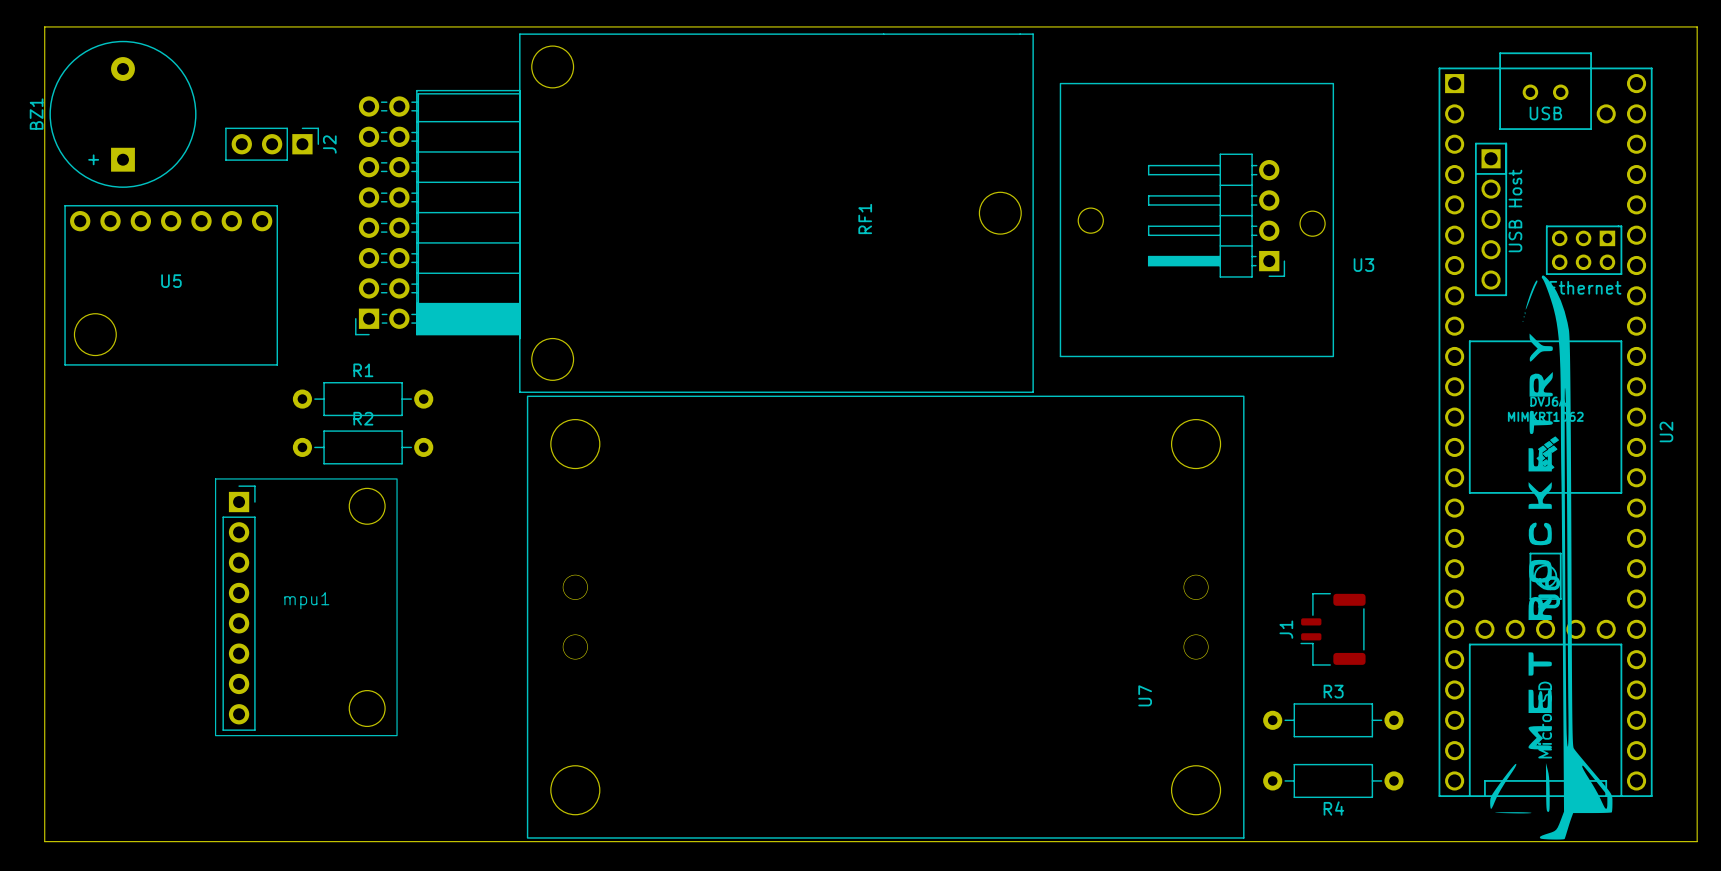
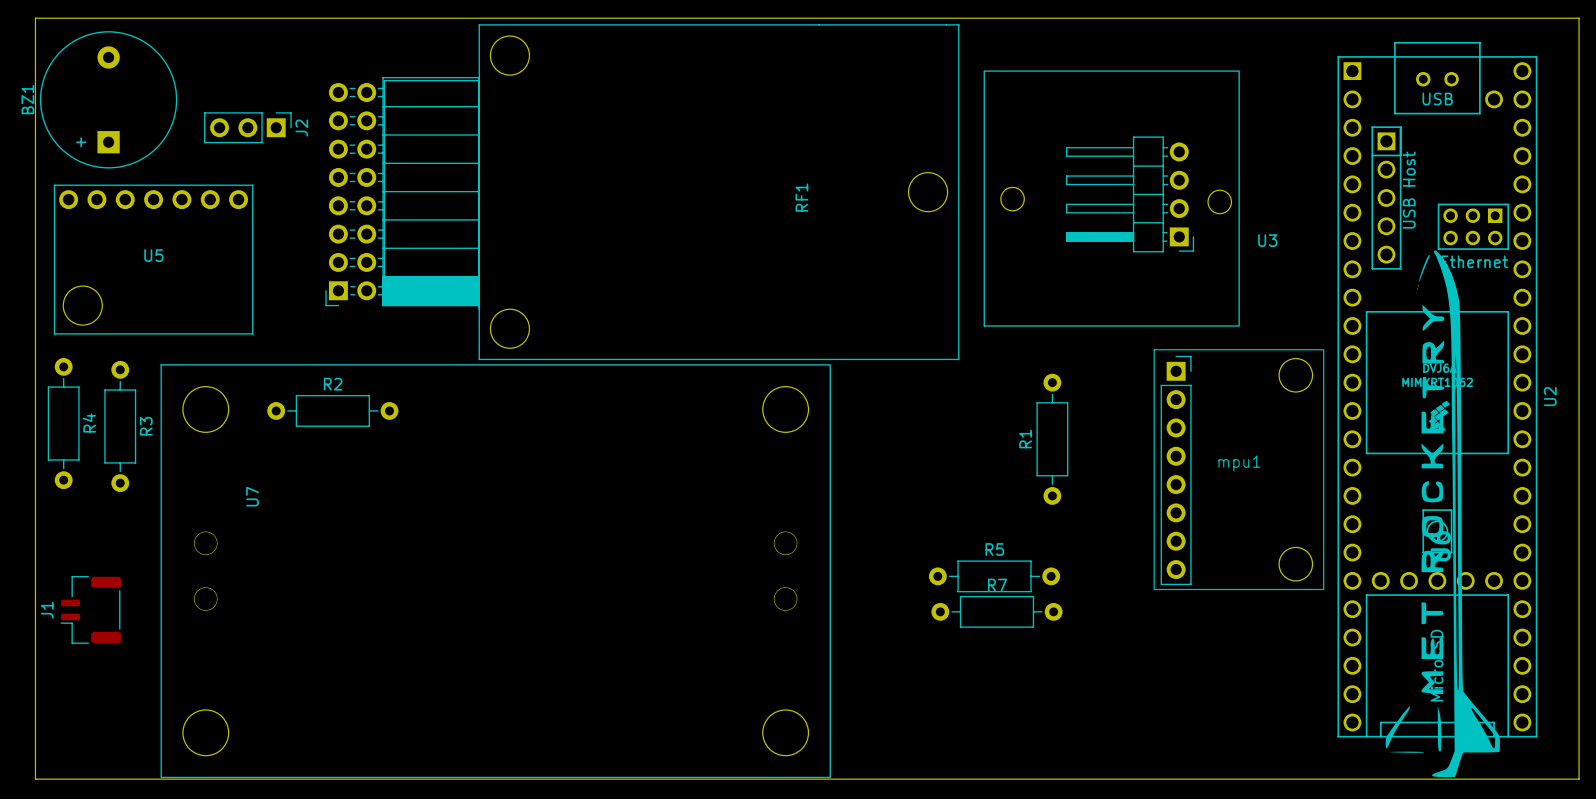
R1 name position: R1 (363, 370) -> R1 (1025, 439)
R1 rotation: 0° (363, 399) -> 90° clockwise (1052, 439)
R1 position: (363, 399) -> (1052, 439)
mpu1 position: (306, 607) -> (1238, 469)
U7 position: (885, 617) -> (495, 571)
R5: none -> (994, 576)
J1 position: (1332, 629) -> (90, 609)
R7: none -> (996, 611)
U7 name position: U7 (1145, 695) -> U7 (252, 496)
R3 rotation: 0° (1333, 720) -> 90° clockwise (120, 426)
R3 position: (1333, 720) -> (120, 426)
R4 rotation: 0° (1333, 780) -> 90° clockwise (63, 423)
R4 position: (1333, 780) -> (63, 423)
R4 name position: R4 (1333, 808) -> R4 (89, 422)

